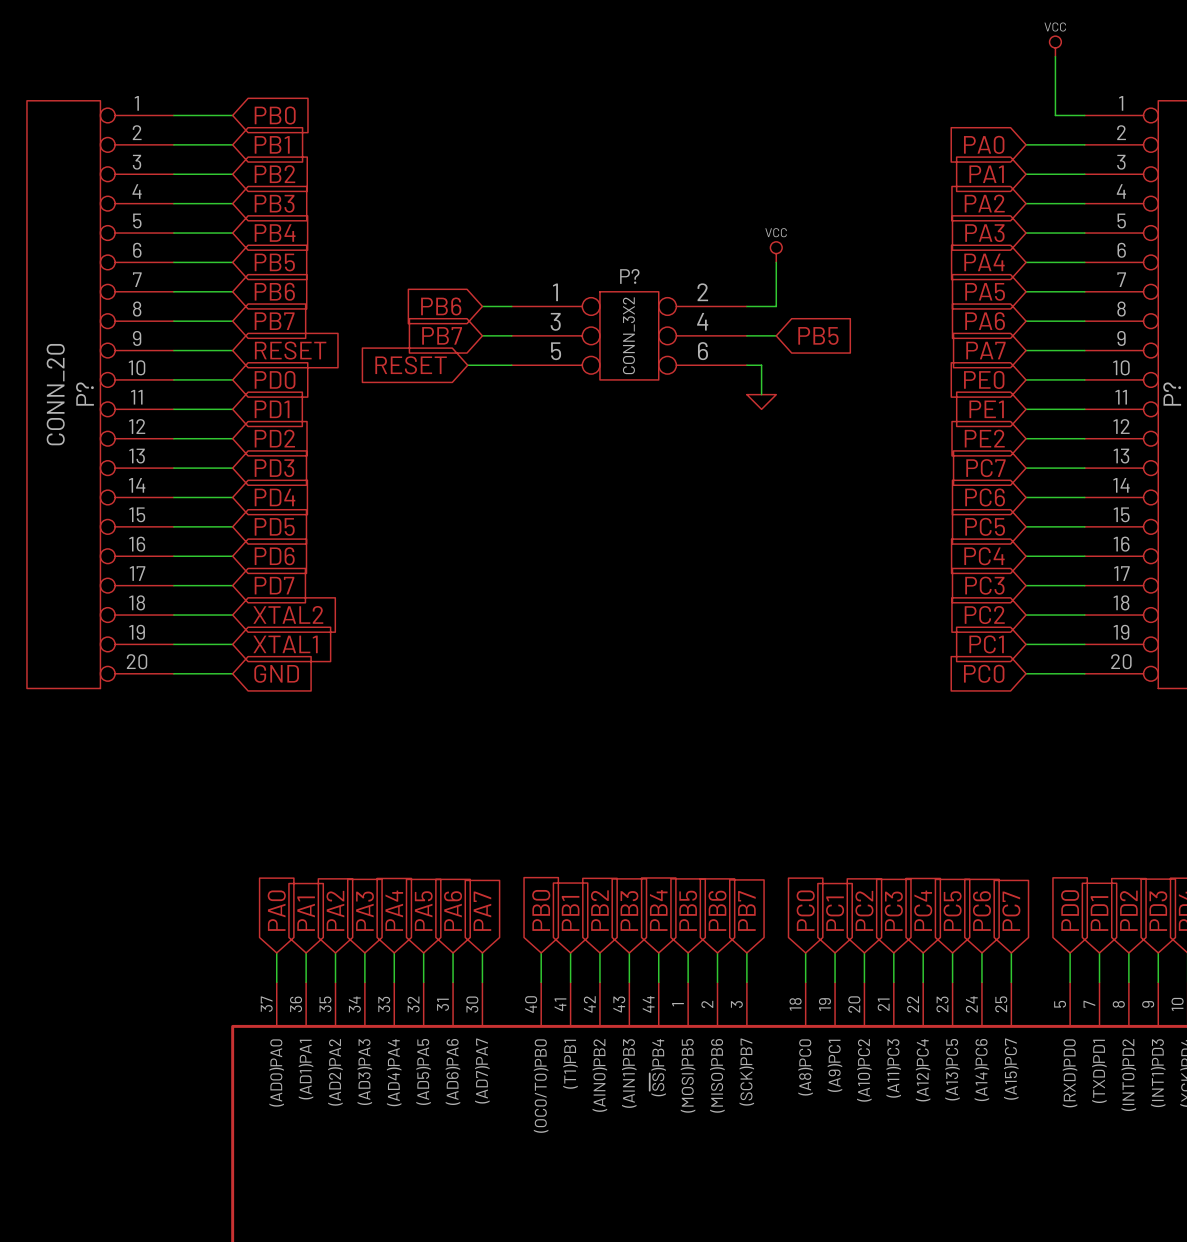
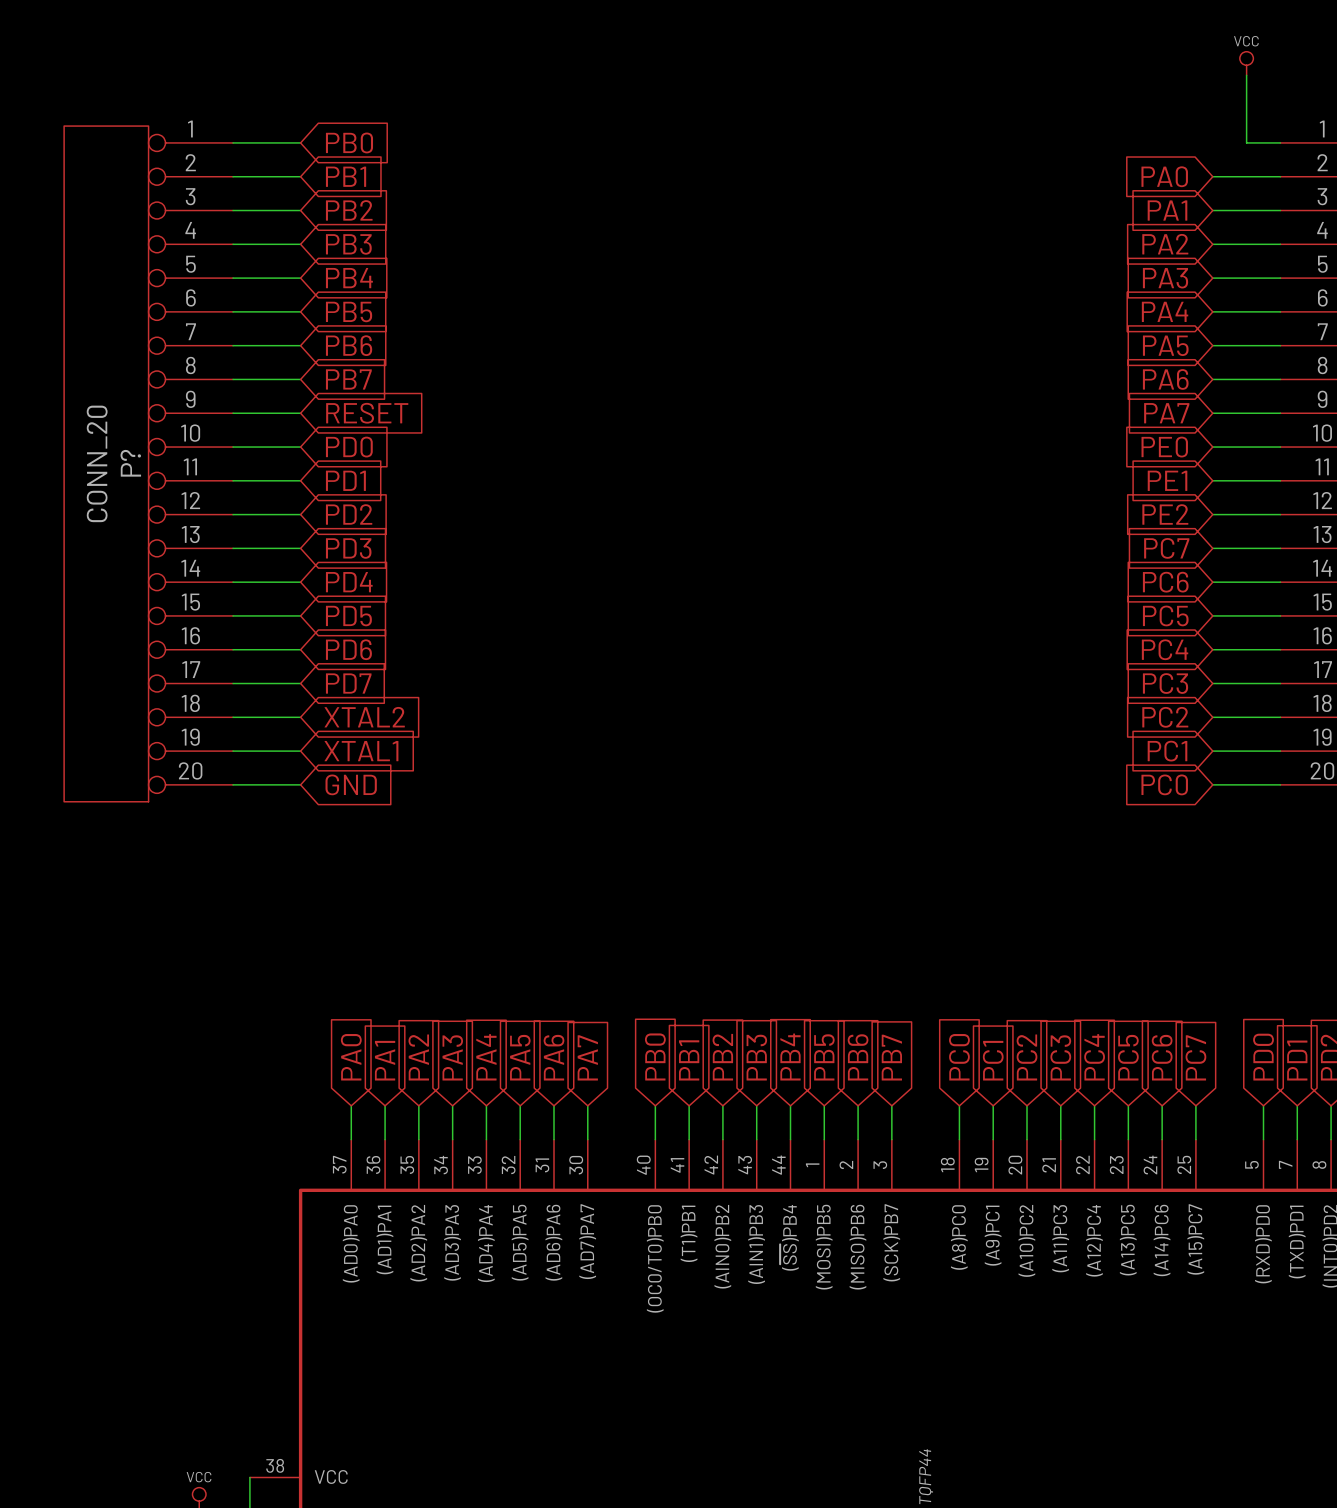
power symbol: VCC (776, 252) -> none
wire: (776, 262) (776, 306) (746, 306) -> none
global label: PB6 (441, 306) -> none
wire: (482, 306) (511, 306) -> none
global label: PB7 (442, 335) -> none
wire: (482, 335) (511, 335) -> none
P?: CONN_3X2 (629, 335) -> none
wire: (746, 335) (776, 335) -> none
global label: PB5 (818, 335) -> none
global label: RESET (411, 365) -> none
wire: (467, 365) (511, 365) -> none
wire: (746, 365) (761, 365) (761, 394) -> none
power symbol: (761, 401) -> none

